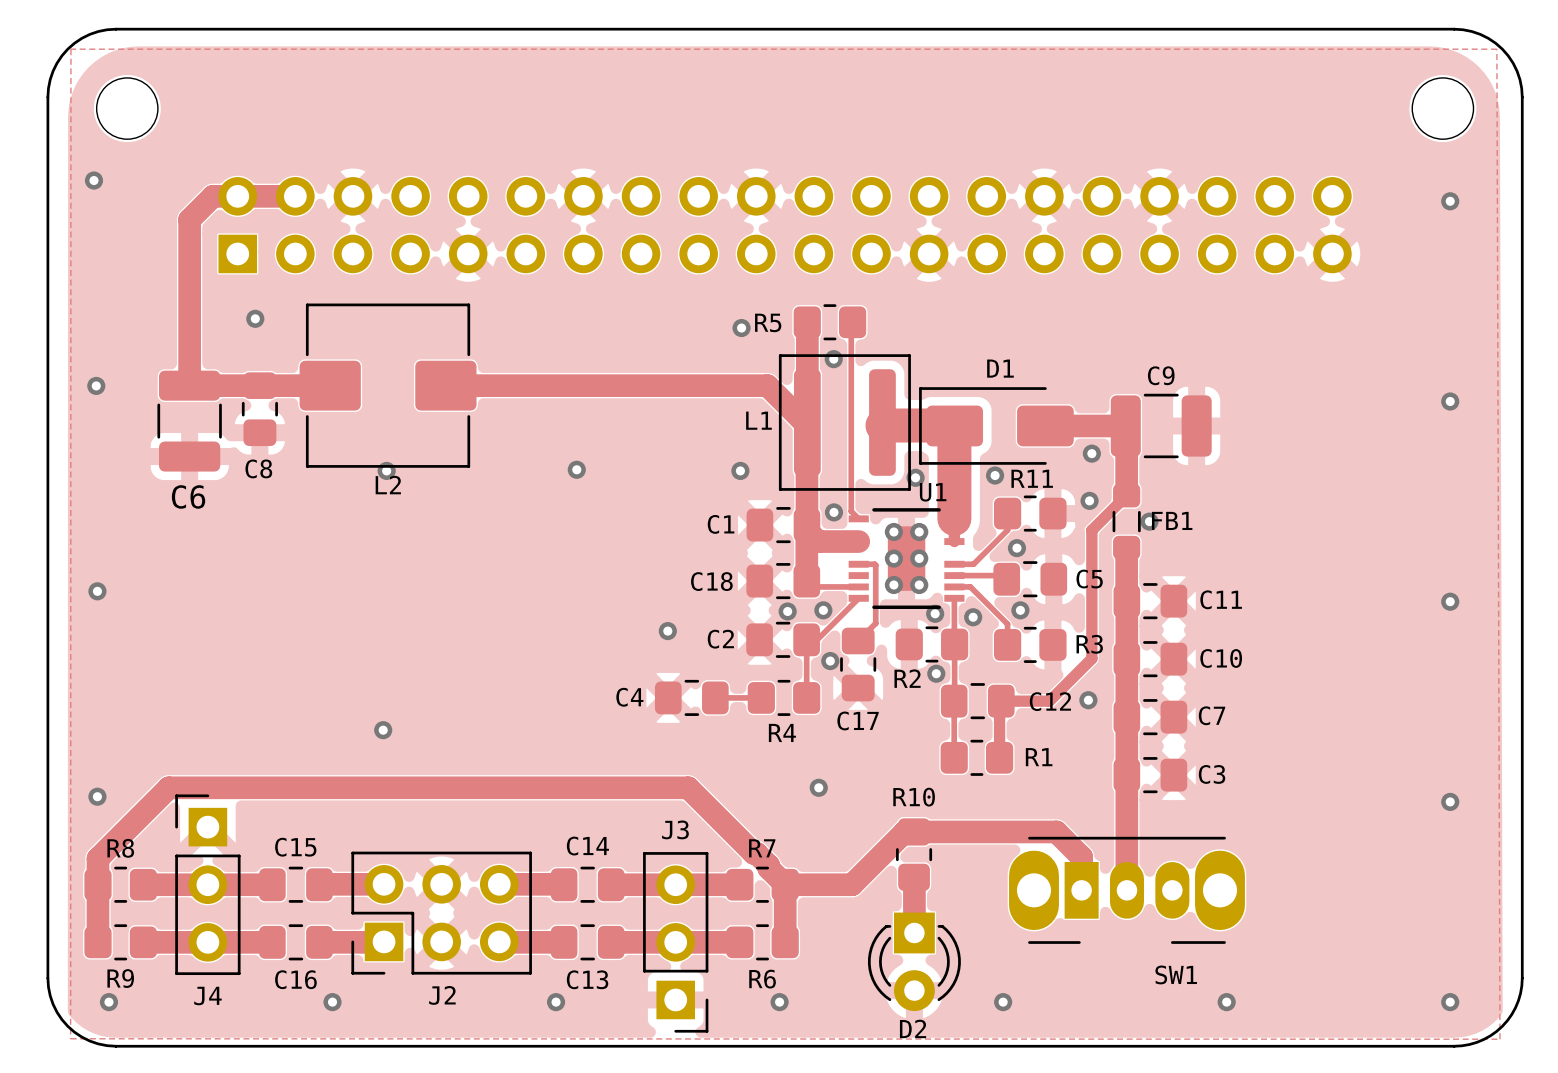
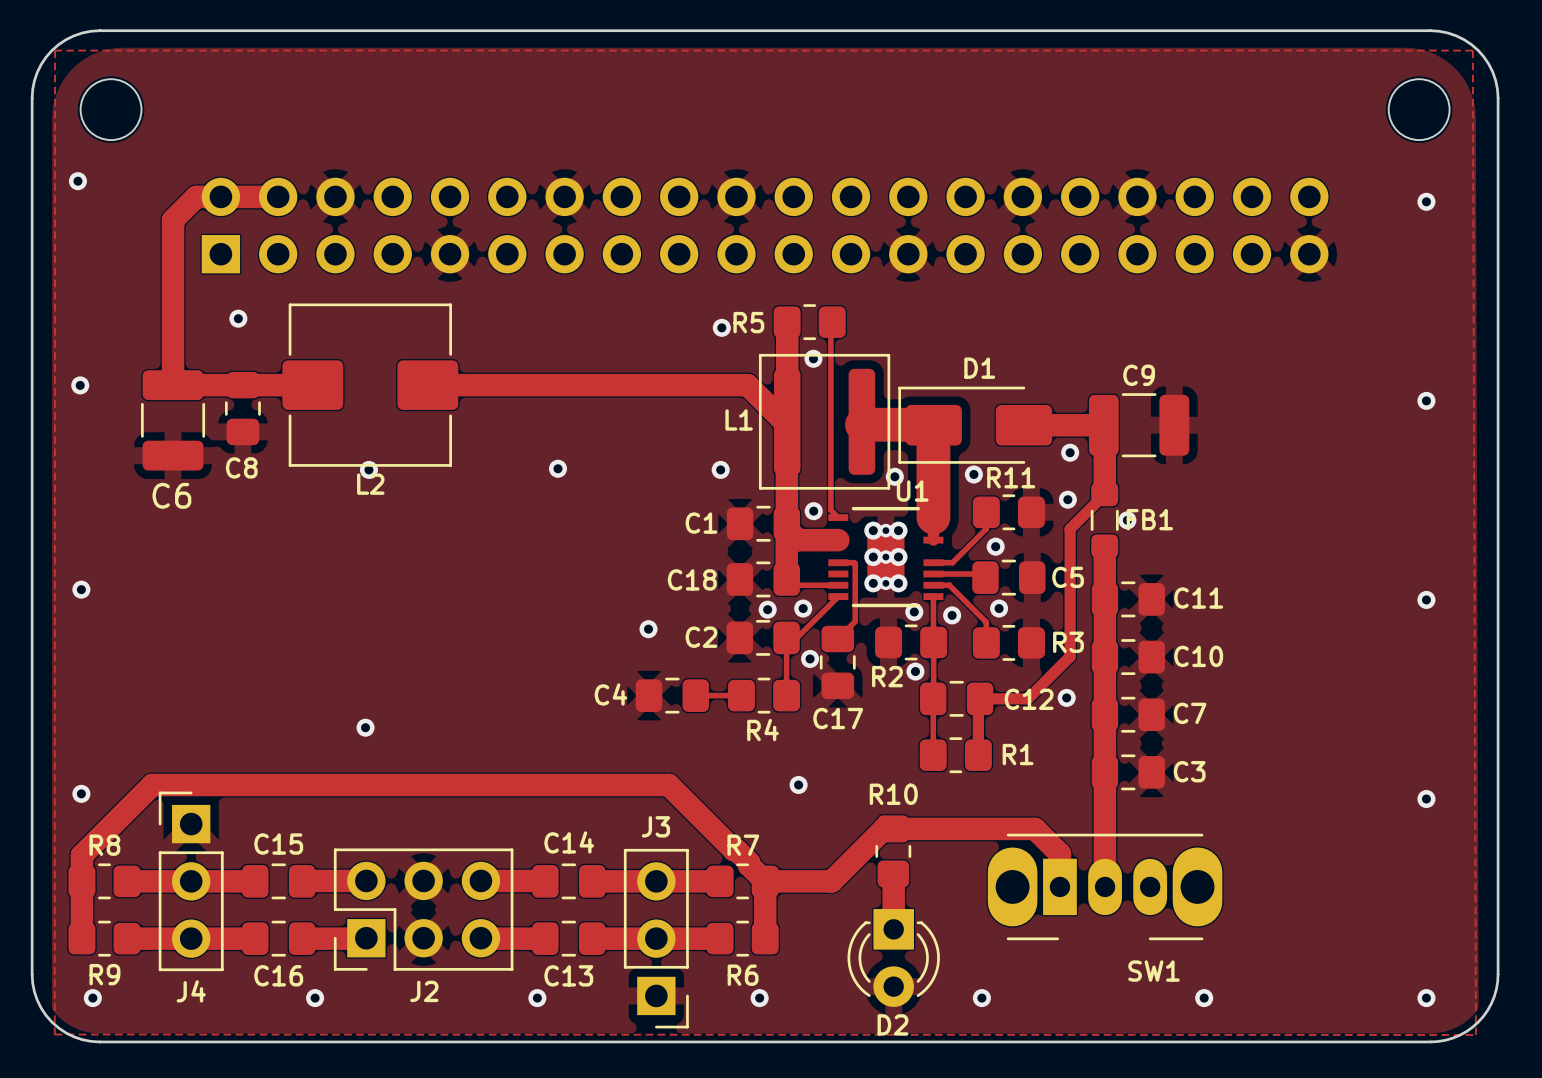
via: none -> (885, 530)
via: none -> (885, 557)
via: none -> (885, 583)

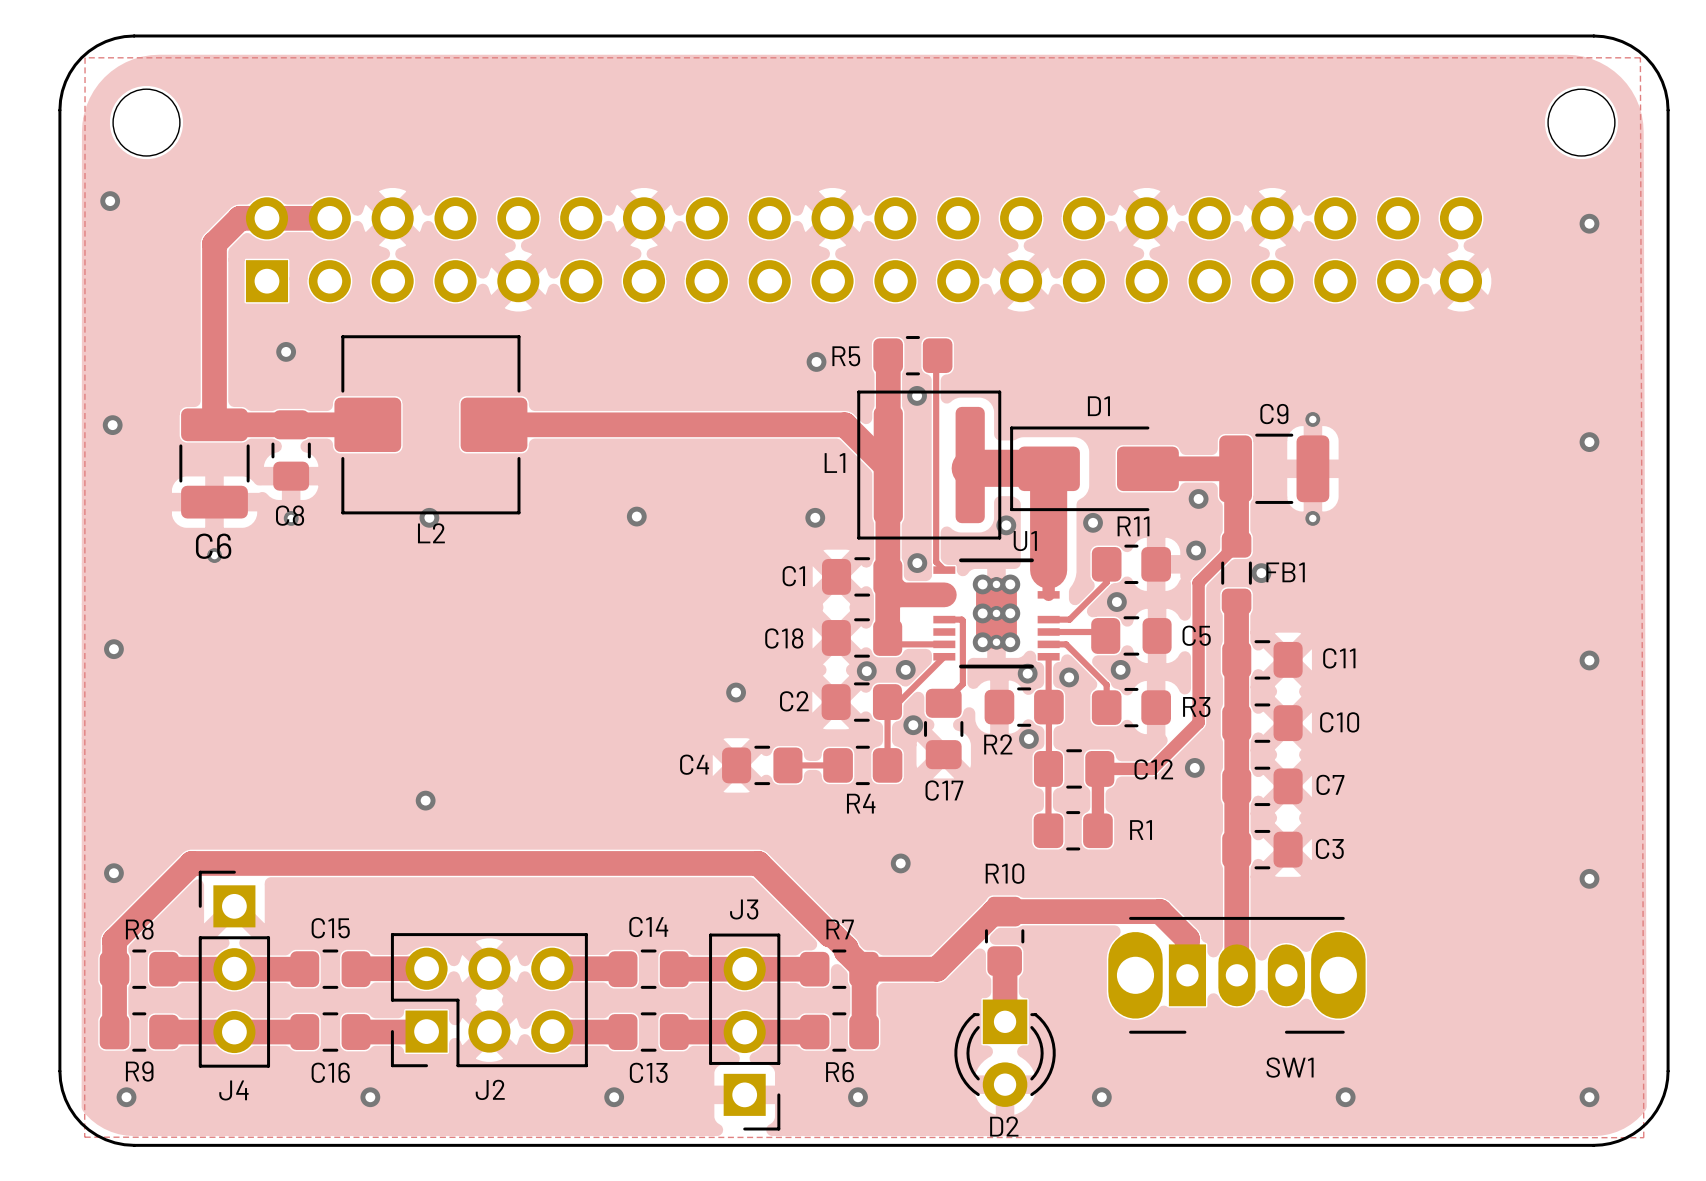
via: none -> (1312, 419)
via: none -> (291, 518)
via: none -> (1312, 518)
via: none -> (214, 555)

